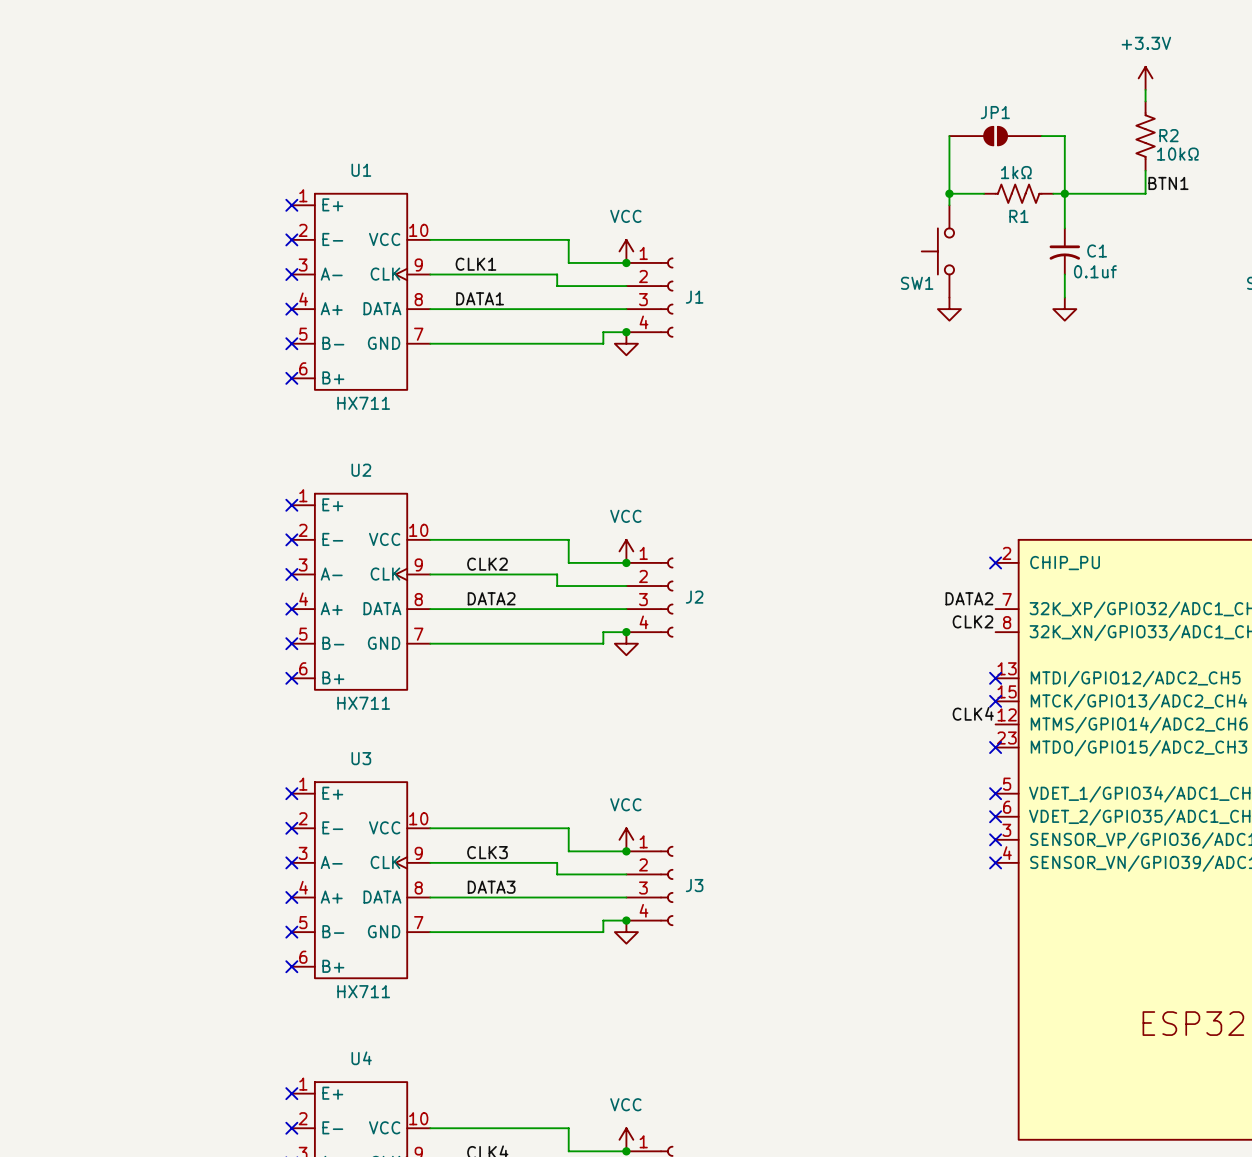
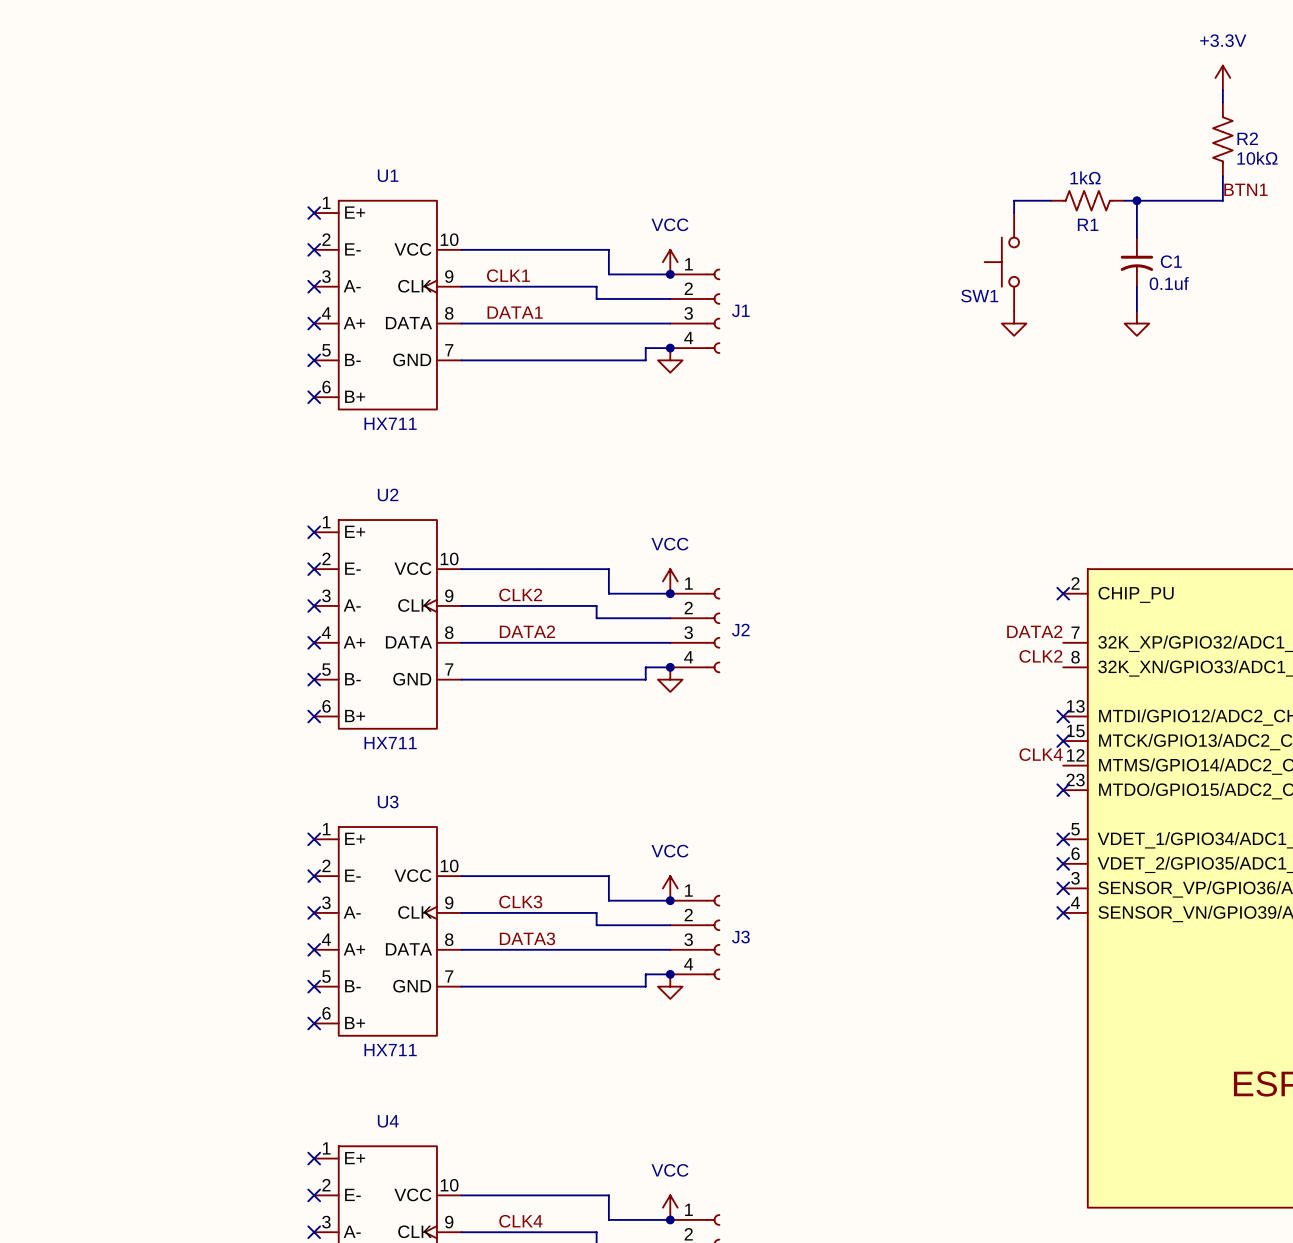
wire: (949, 136) (949, 193) -> none
JP1: (995, 136) -> none
wire: (1041, 136) (1064, 136) (1064, 193) -> none
junction: (949, 193) -> none

